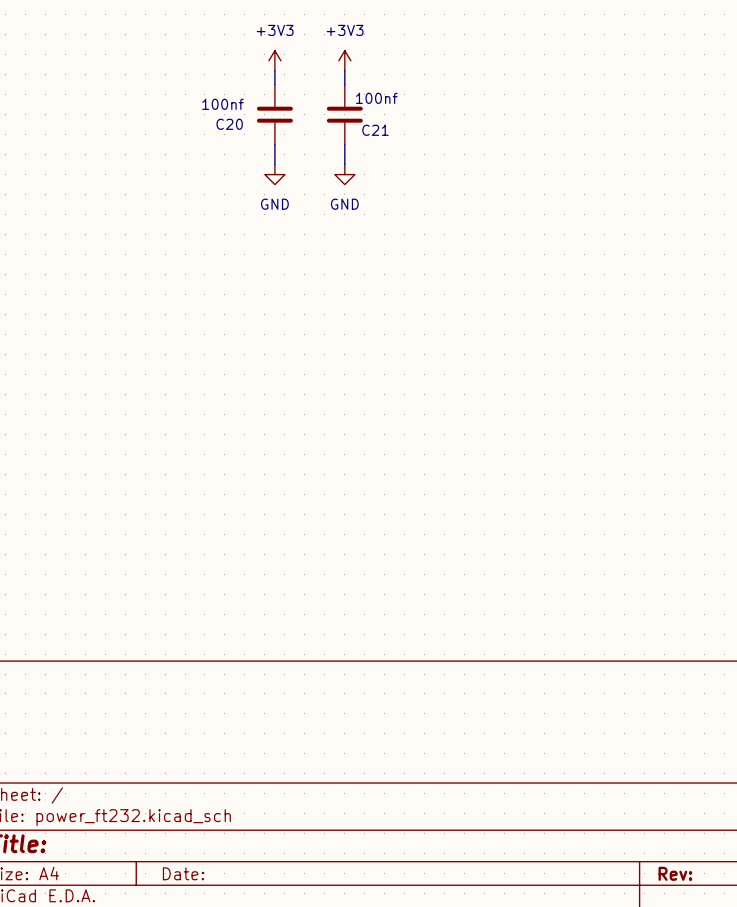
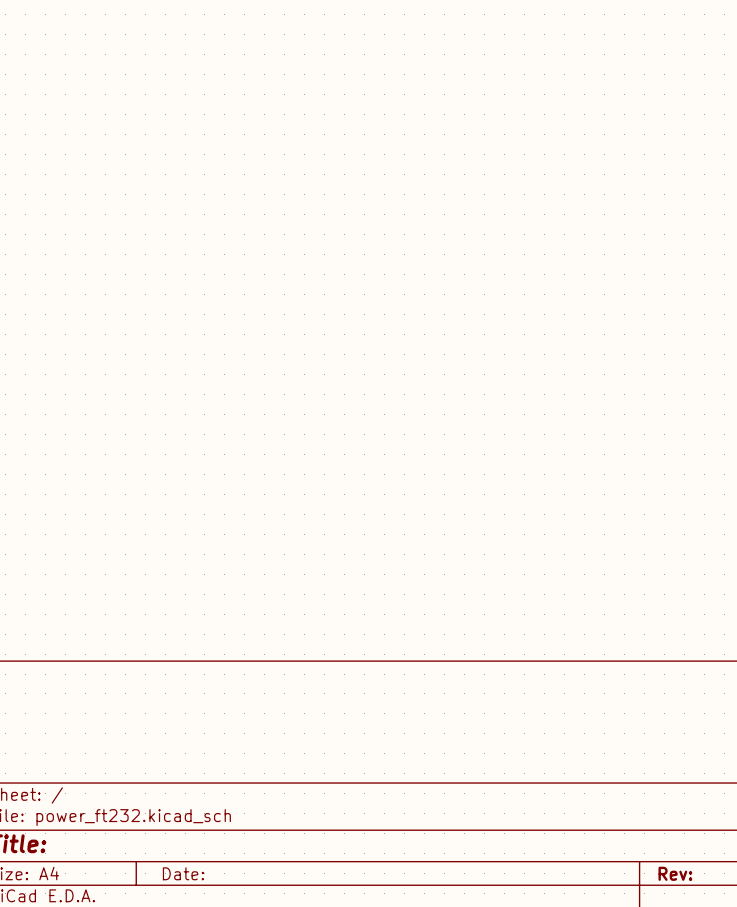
power symbol: +3V3 (274, 60) -> none
power symbol: +3V3 (344, 60) -> none
wire: (274, 70) (274, 84) -> none
wire: (344, 70) (344, 84) -> none
C20: 100nf (274, 114) -> none
C21: 100nf (344, 114) -> none
wire: (274, 144) (274, 164) -> none
wire: (344, 144) (344, 164) -> none
power symbol: GND (274, 174) -> none
power symbol: GND (344, 174) -> none

